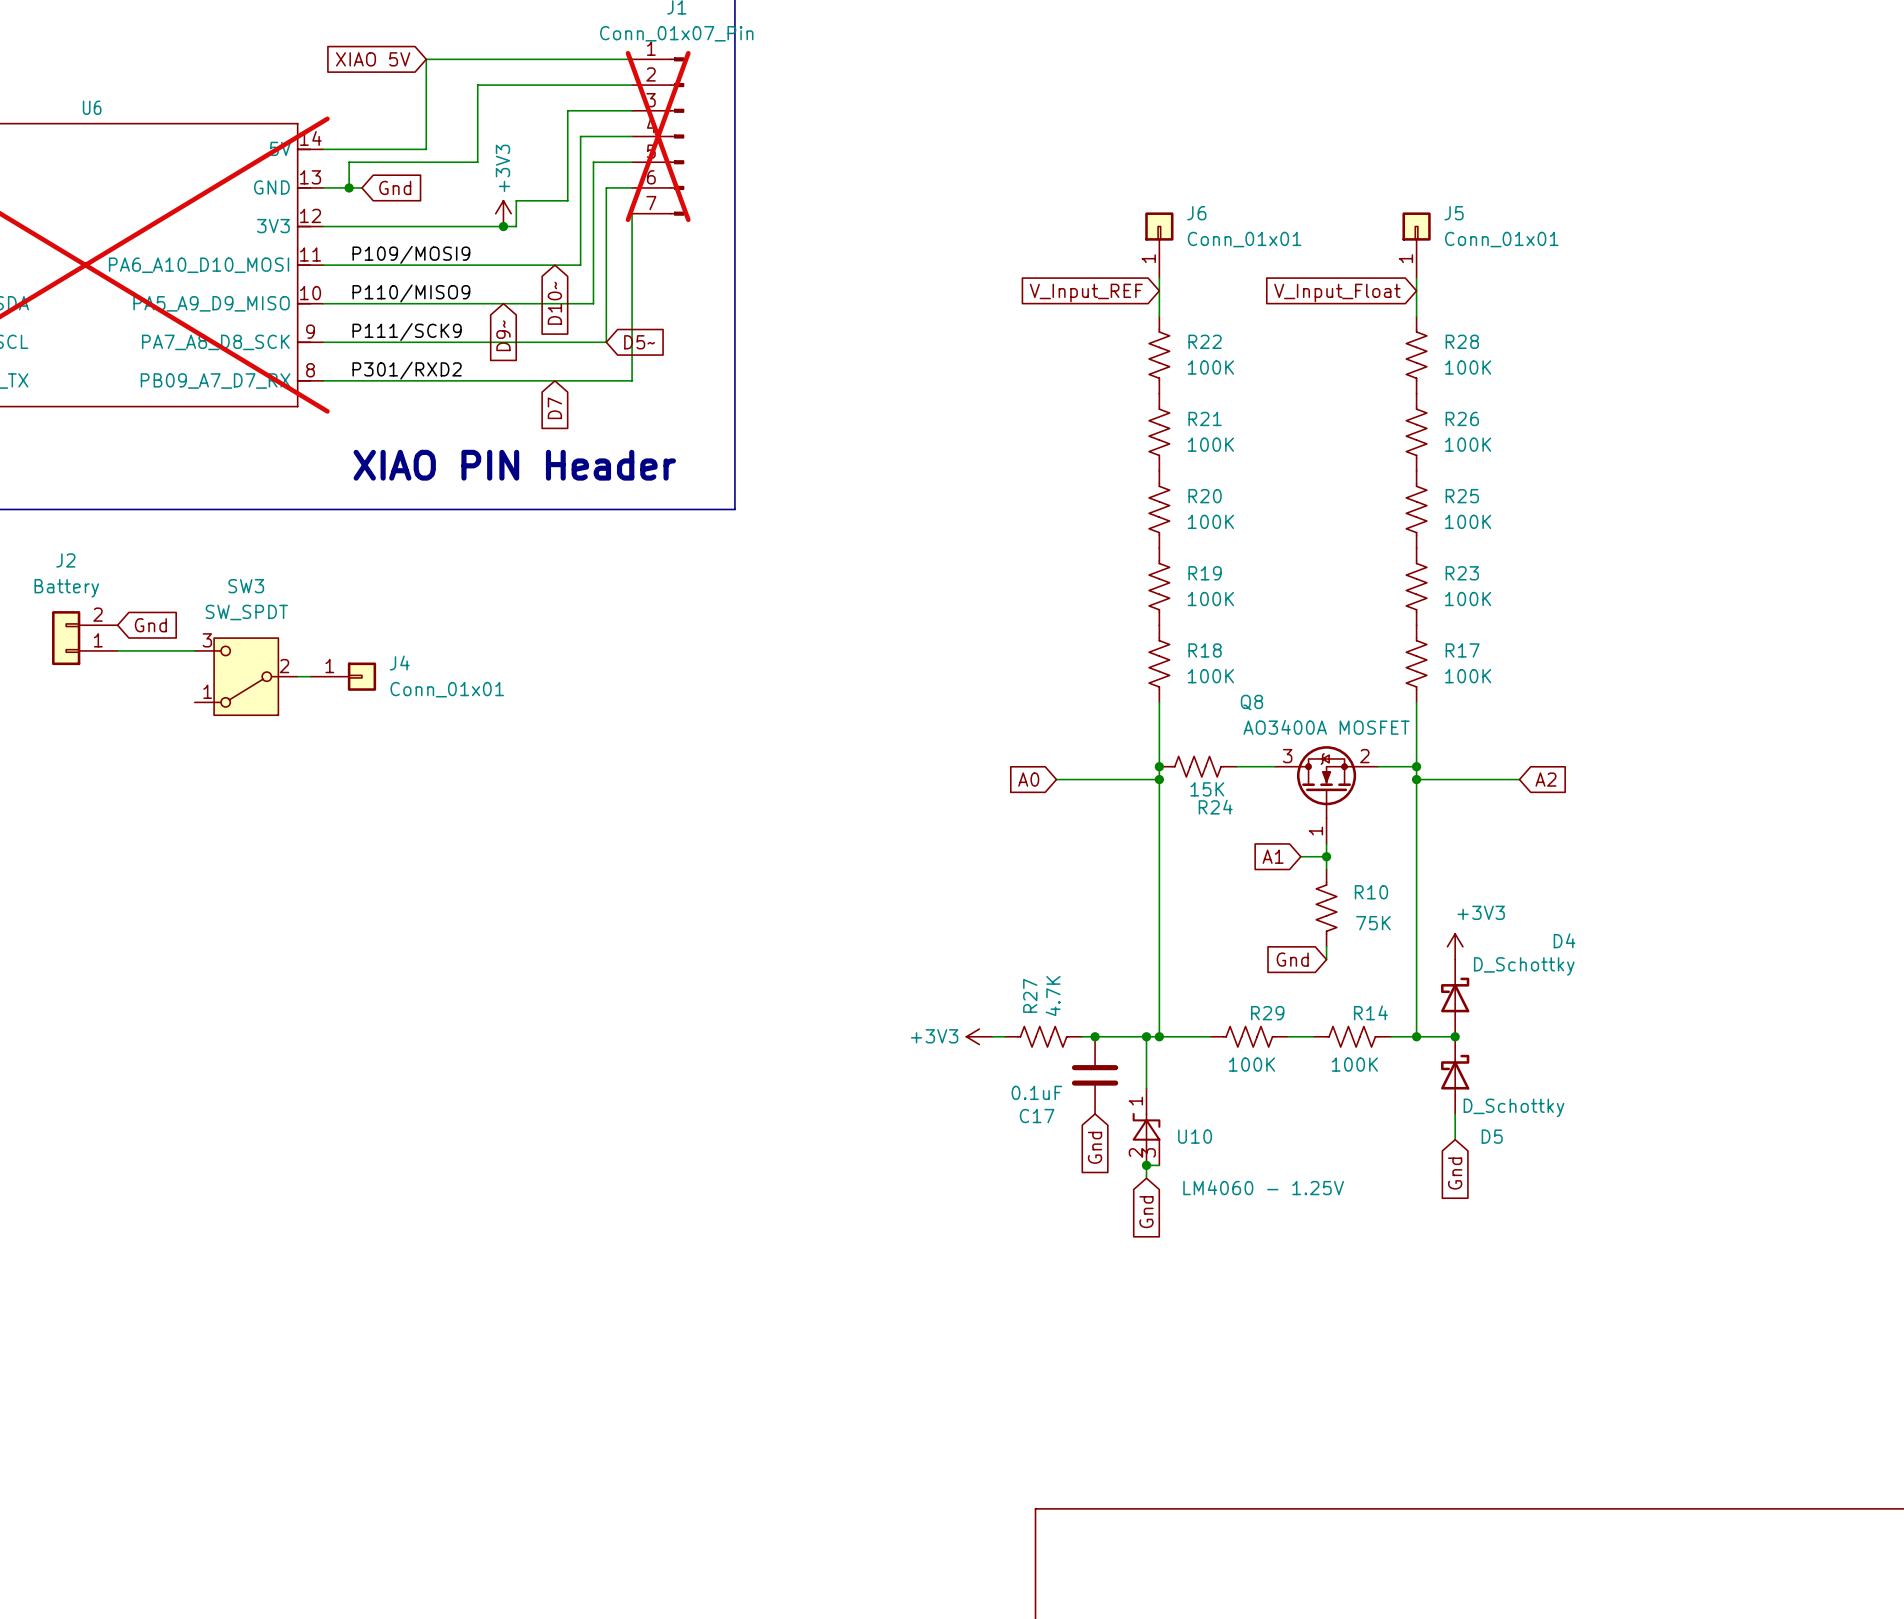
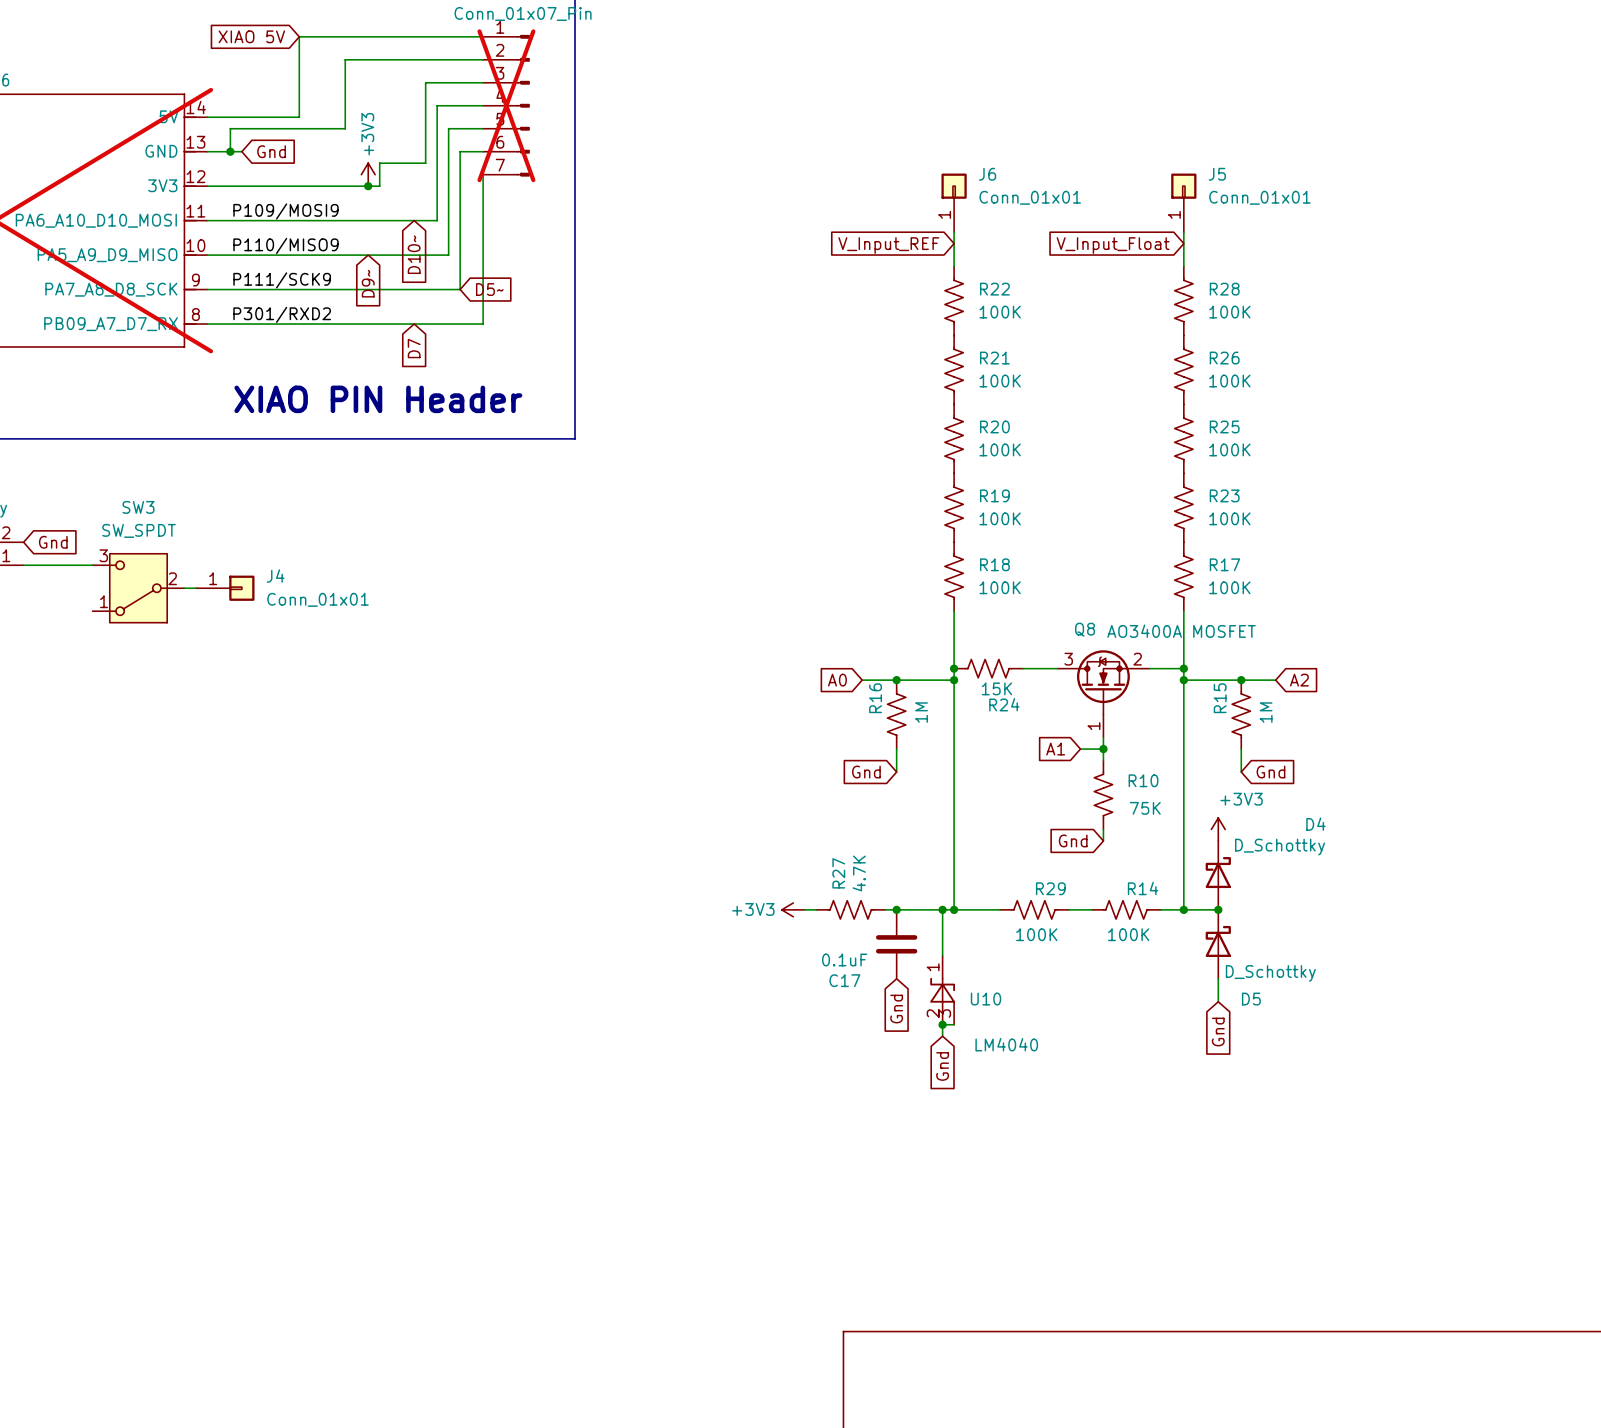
Q8 name position: Q8 (1251, 702) -> Q8 (1085, 629)
Q8 value position: AO3400A MOSFET (1326, 727) -> AO3400A MOSFET (1181, 631)
junction: none -> (896, 680)
junction: none -> (1241, 680)
R16: none -> 1M (896, 714)
R15: none -> 1M (1241, 714)
wire: none -> (896, 749) (896, 772)
wire: none -> (1241, 749) (1241, 772)
global label: none -> Gnd (866, 772)
global label: none -> Gnd (1270, 772)
U10 value: LM4060 - 1.25V (1263, 1187) -> LM4040 (1006, 1044)

